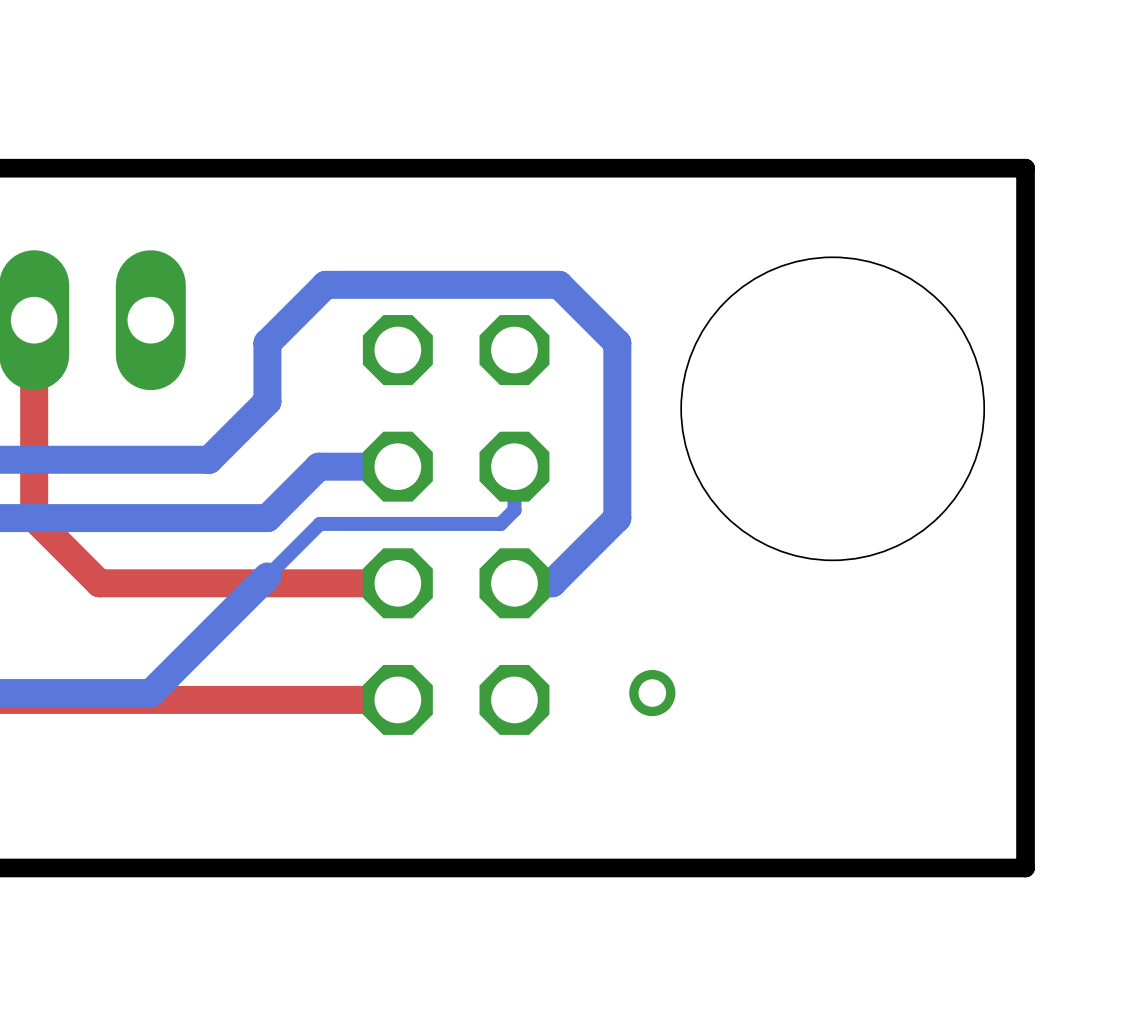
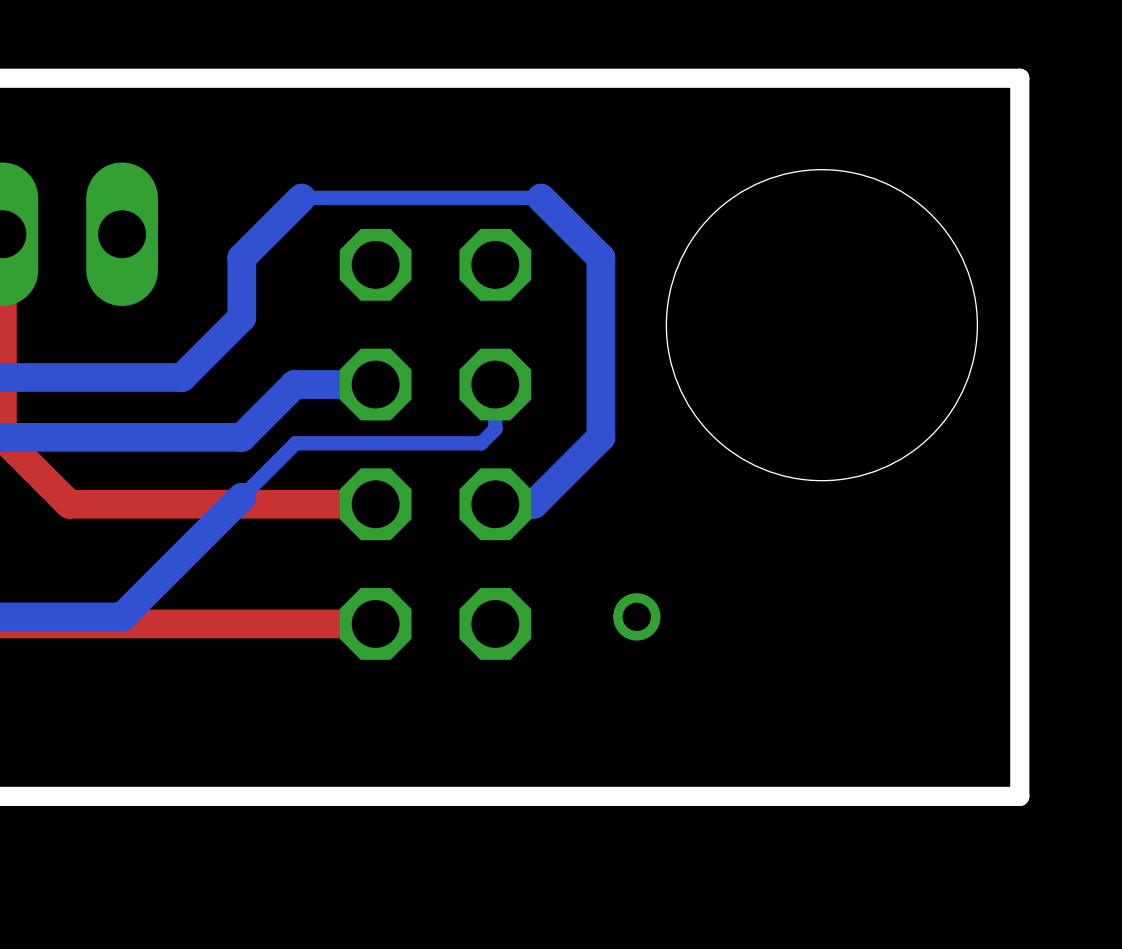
bottom track width: thick (559, 284) (325, 284) -> thin (541, 197) (301, 197)

